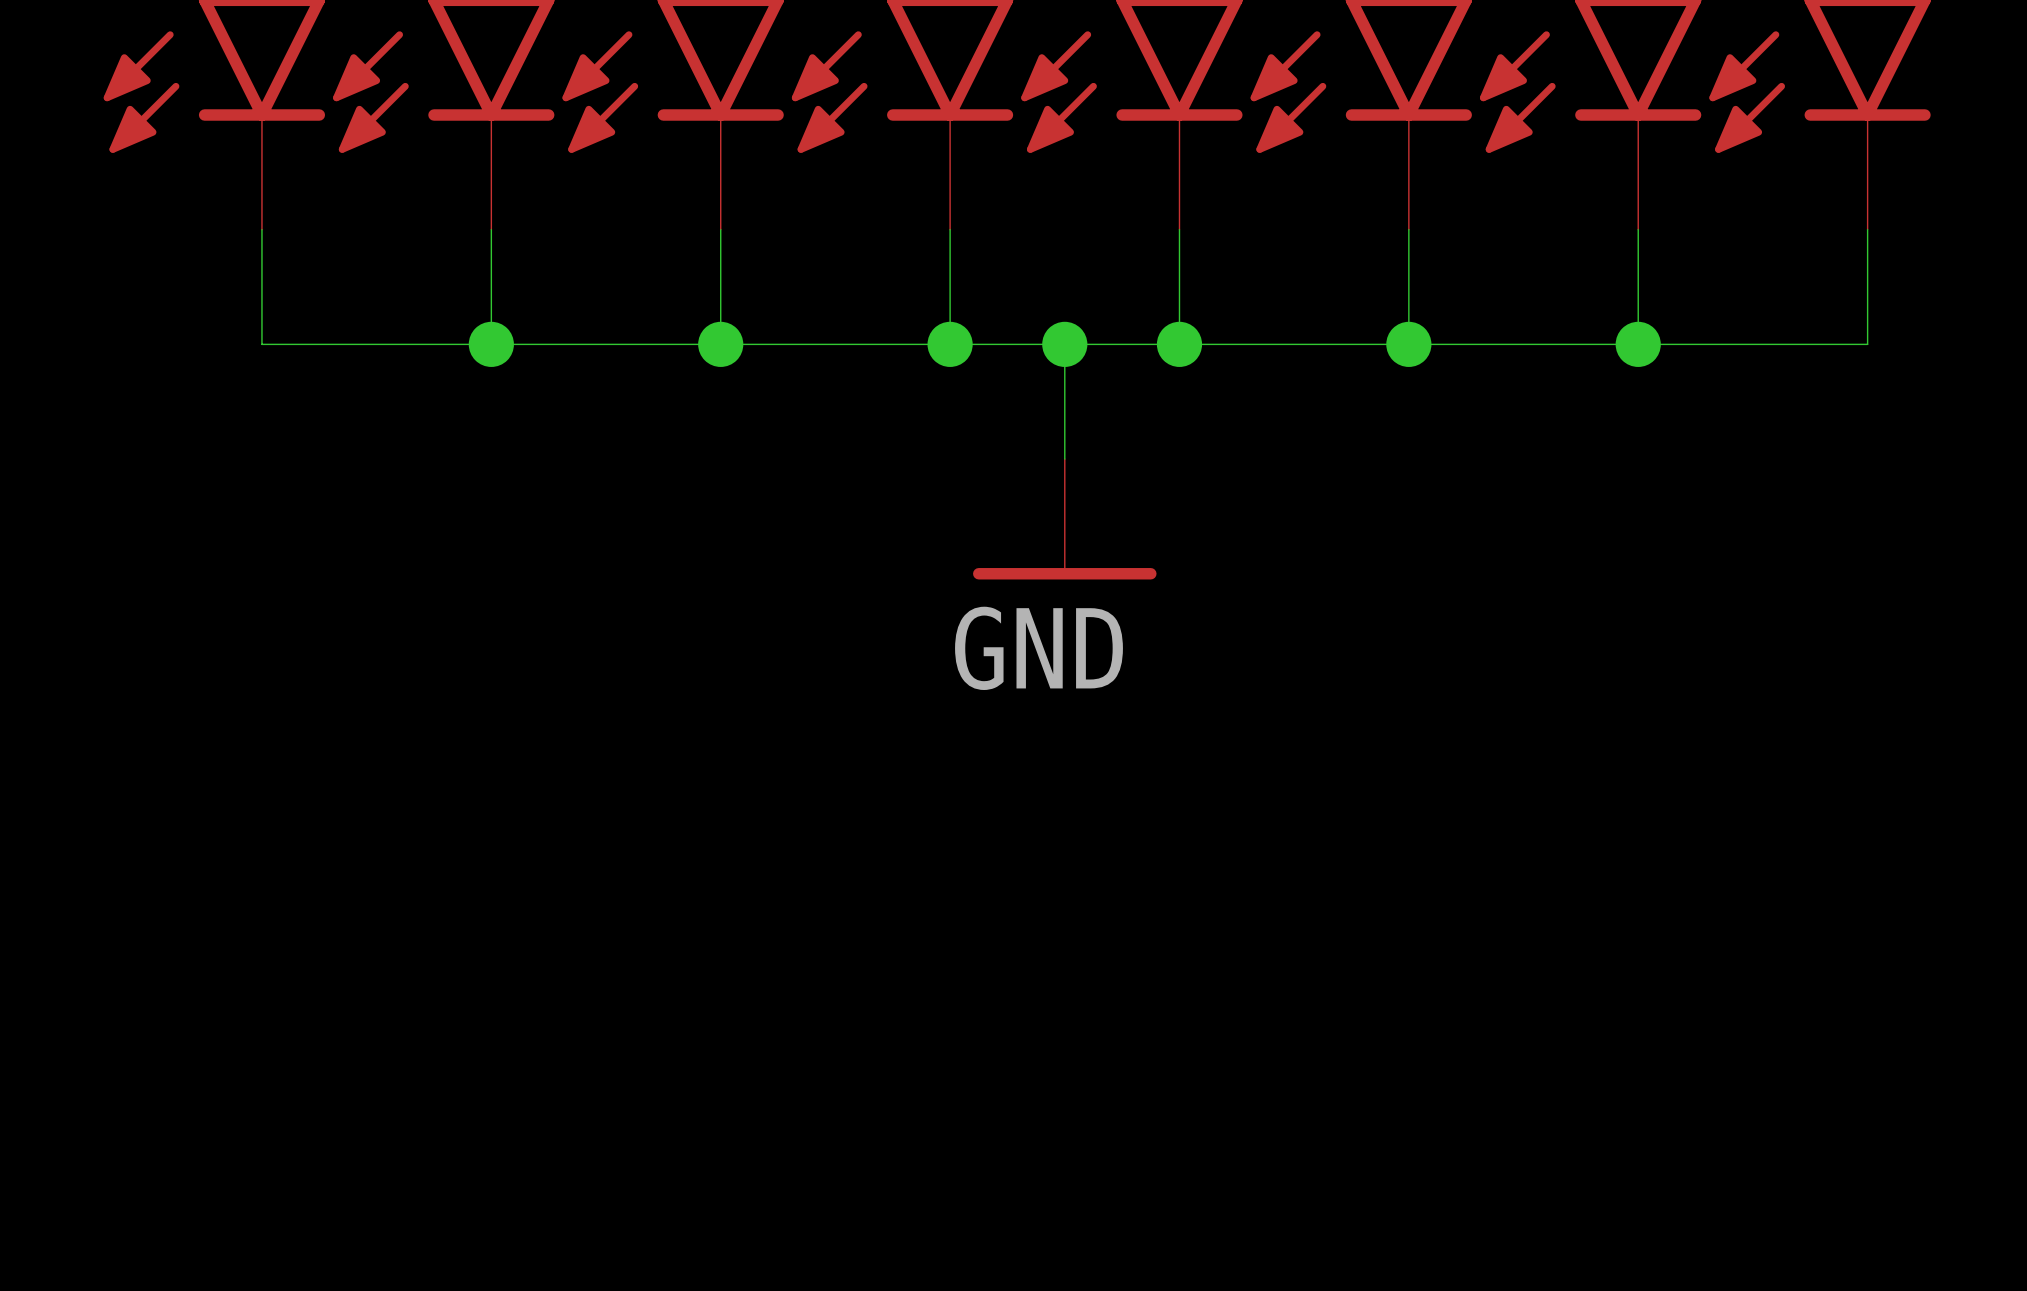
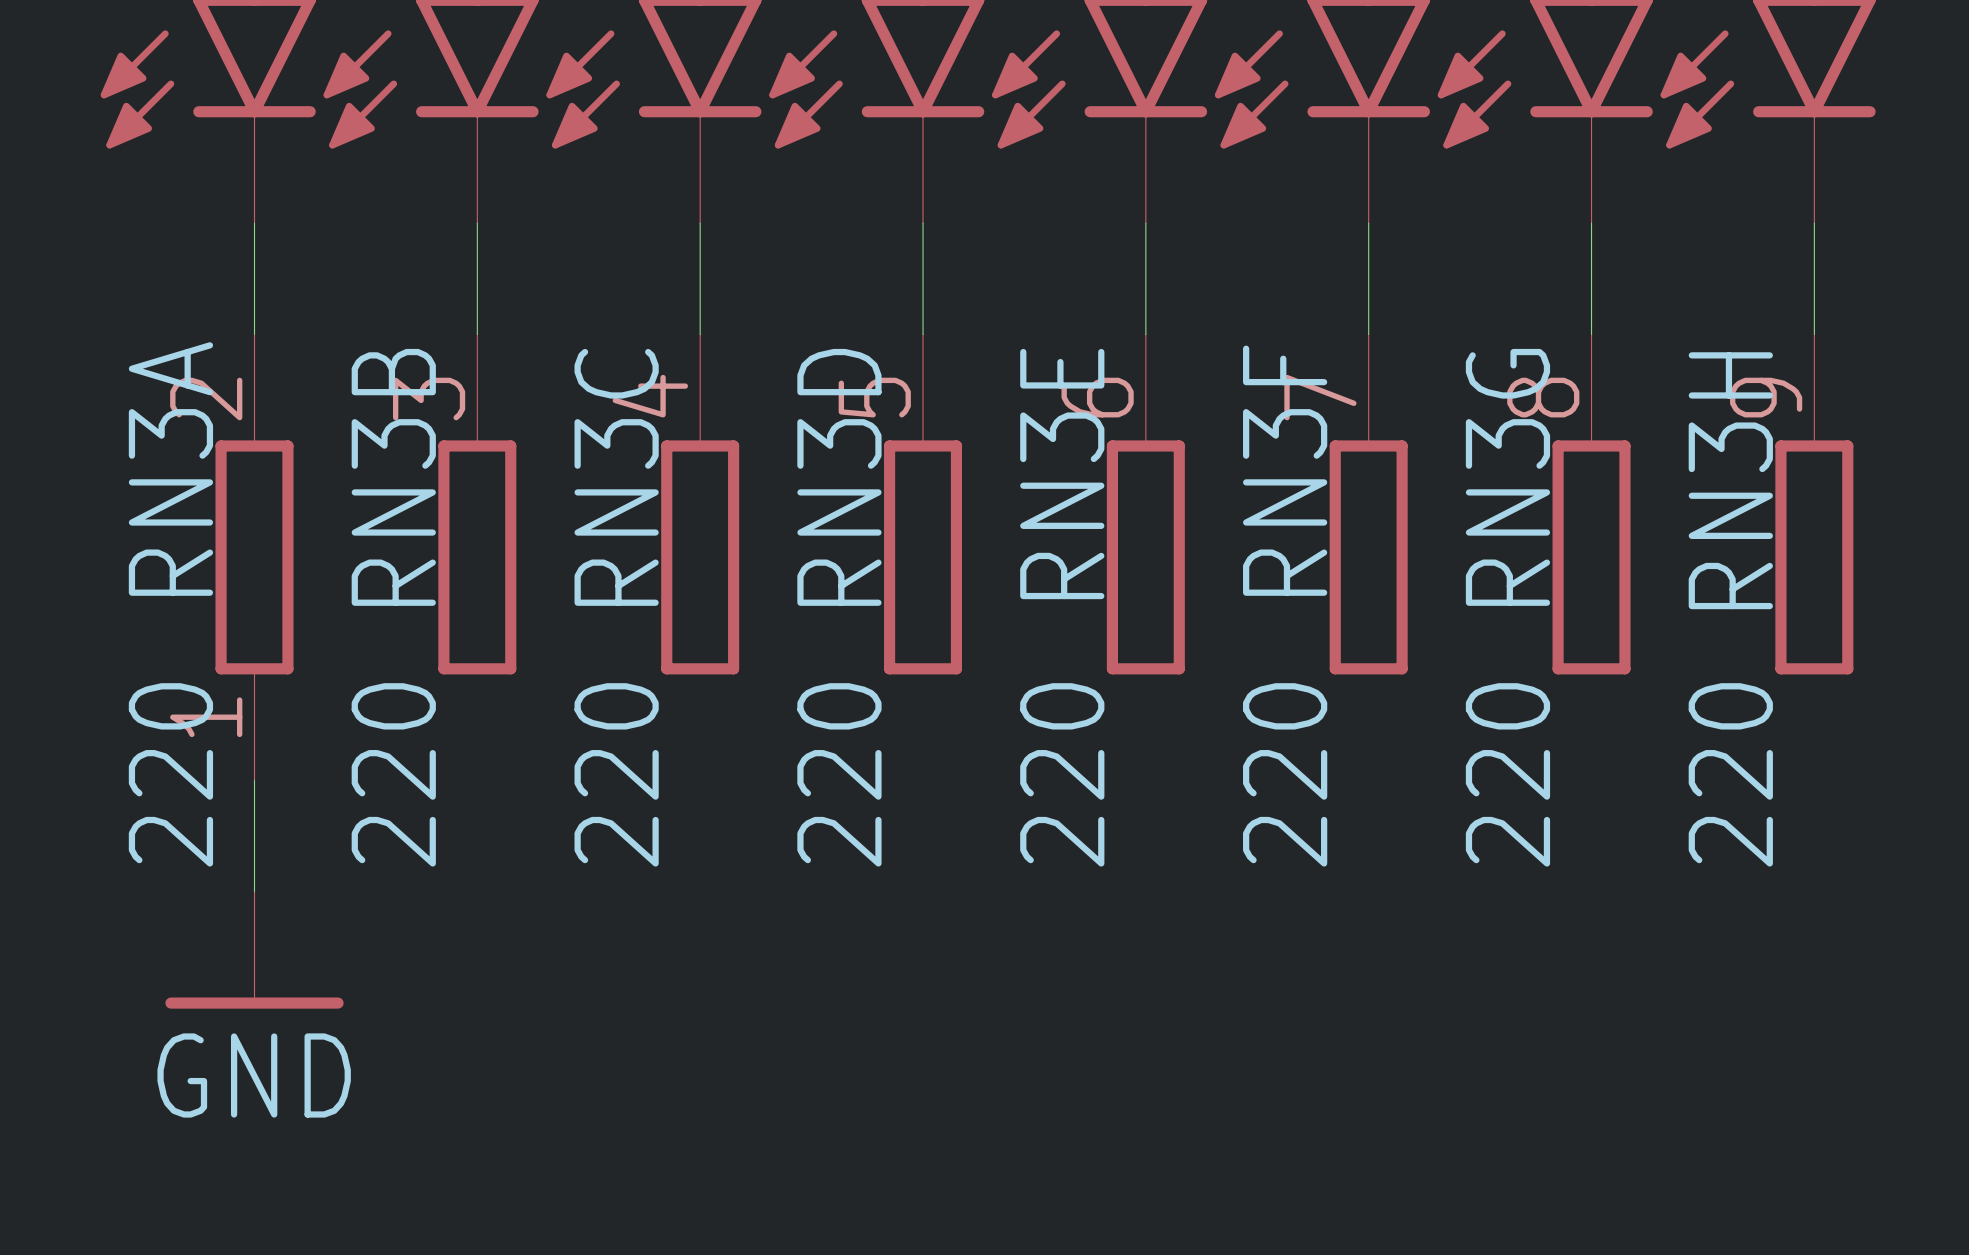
wire: (261, 344) (1867, 344) -> none
junction: (491, 344) -> none
junction: (720, 344) -> none
junction: (950, 344) -> none
wire: (1064, 344) (1064, 459) -> (254, 780) (254, 891)
junction: (1064, 344) -> none
junction: (1179, 344) -> none
junction: (1408, 344) -> none
junction: (1638, 344) -> none
RN3B: none -> 220 (477, 504)
RN3C: none -> 220 (700, 504)
RN3D: none -> 220 (923, 504)
power symbol position: GND (1064, 519) -> GND (254, 950)
RN3E: none -> 220 (1145, 504)
RN3F: none -> 220 (1368, 504)
RN3G: none -> 220 (1591, 504)
RN3H: none -> 220 (1814, 504)
RN3A: none -> 220 (254, 557)

